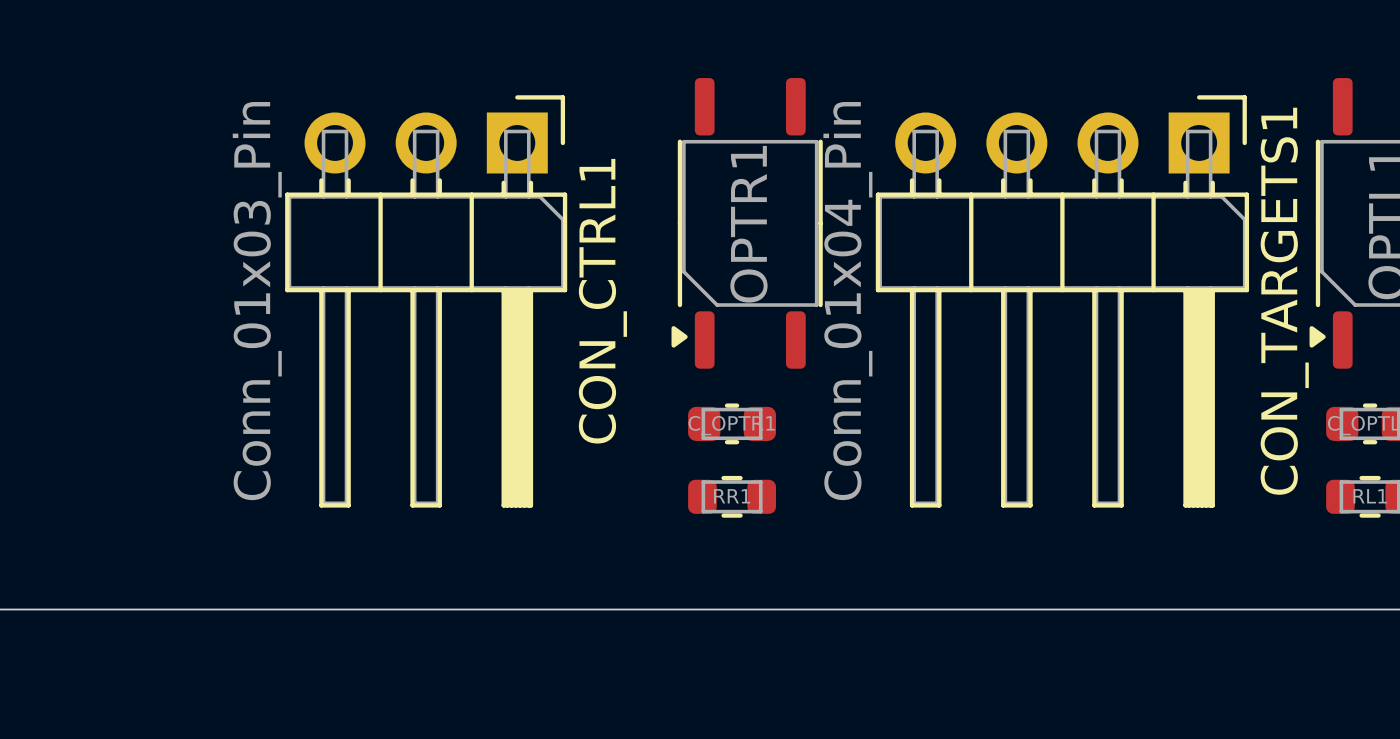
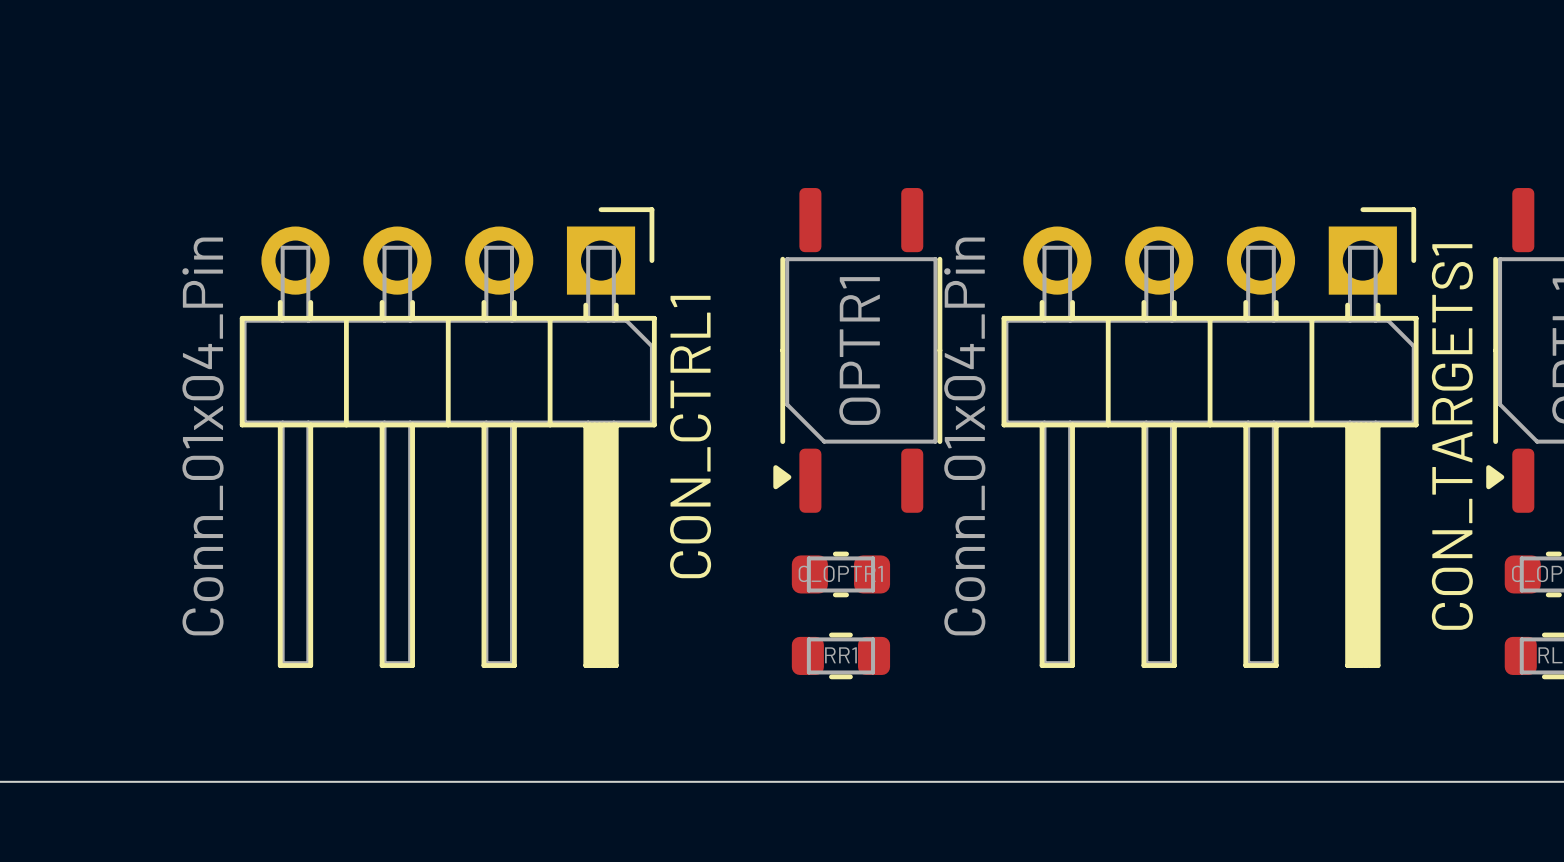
CON_CTRL1 footprint: [285, 95, 568, 508] -> [239, 207, 657, 668]
CON_CTRL1 value: Conn_01x03_Pin (257, 301) -> Conn_01x04_Pin (202, 436)

